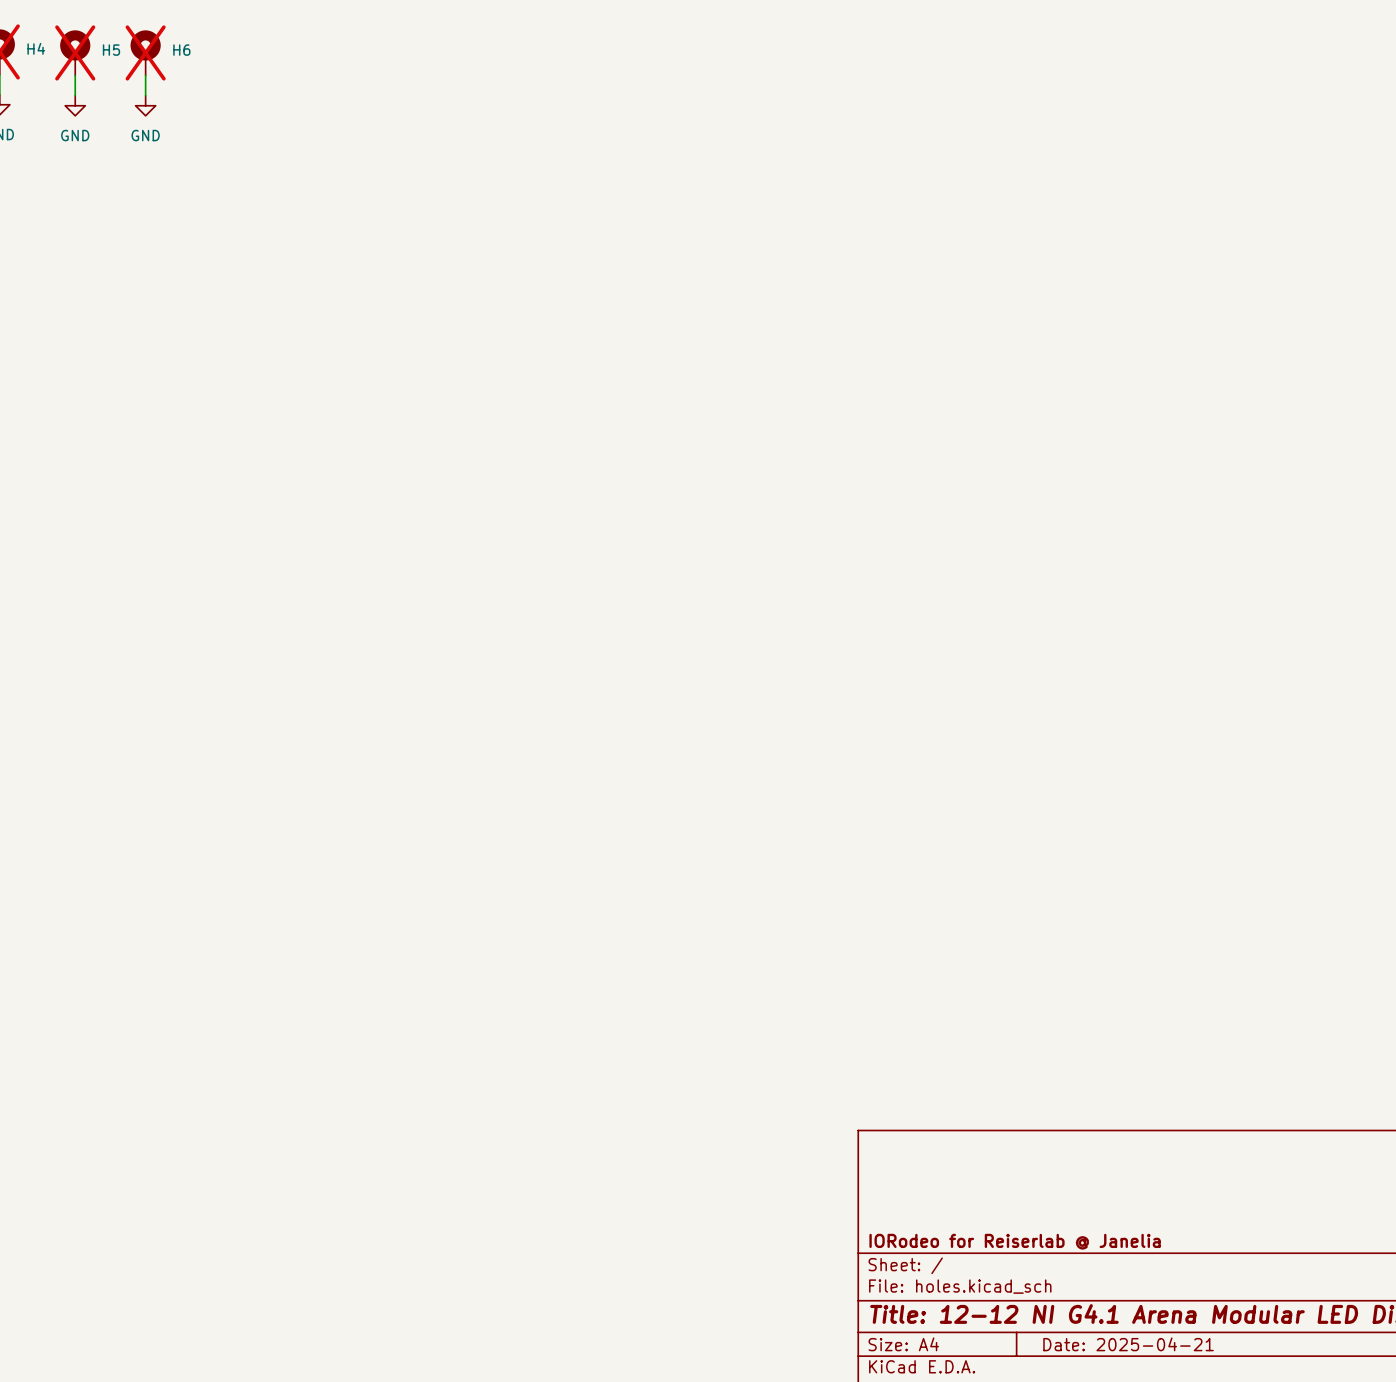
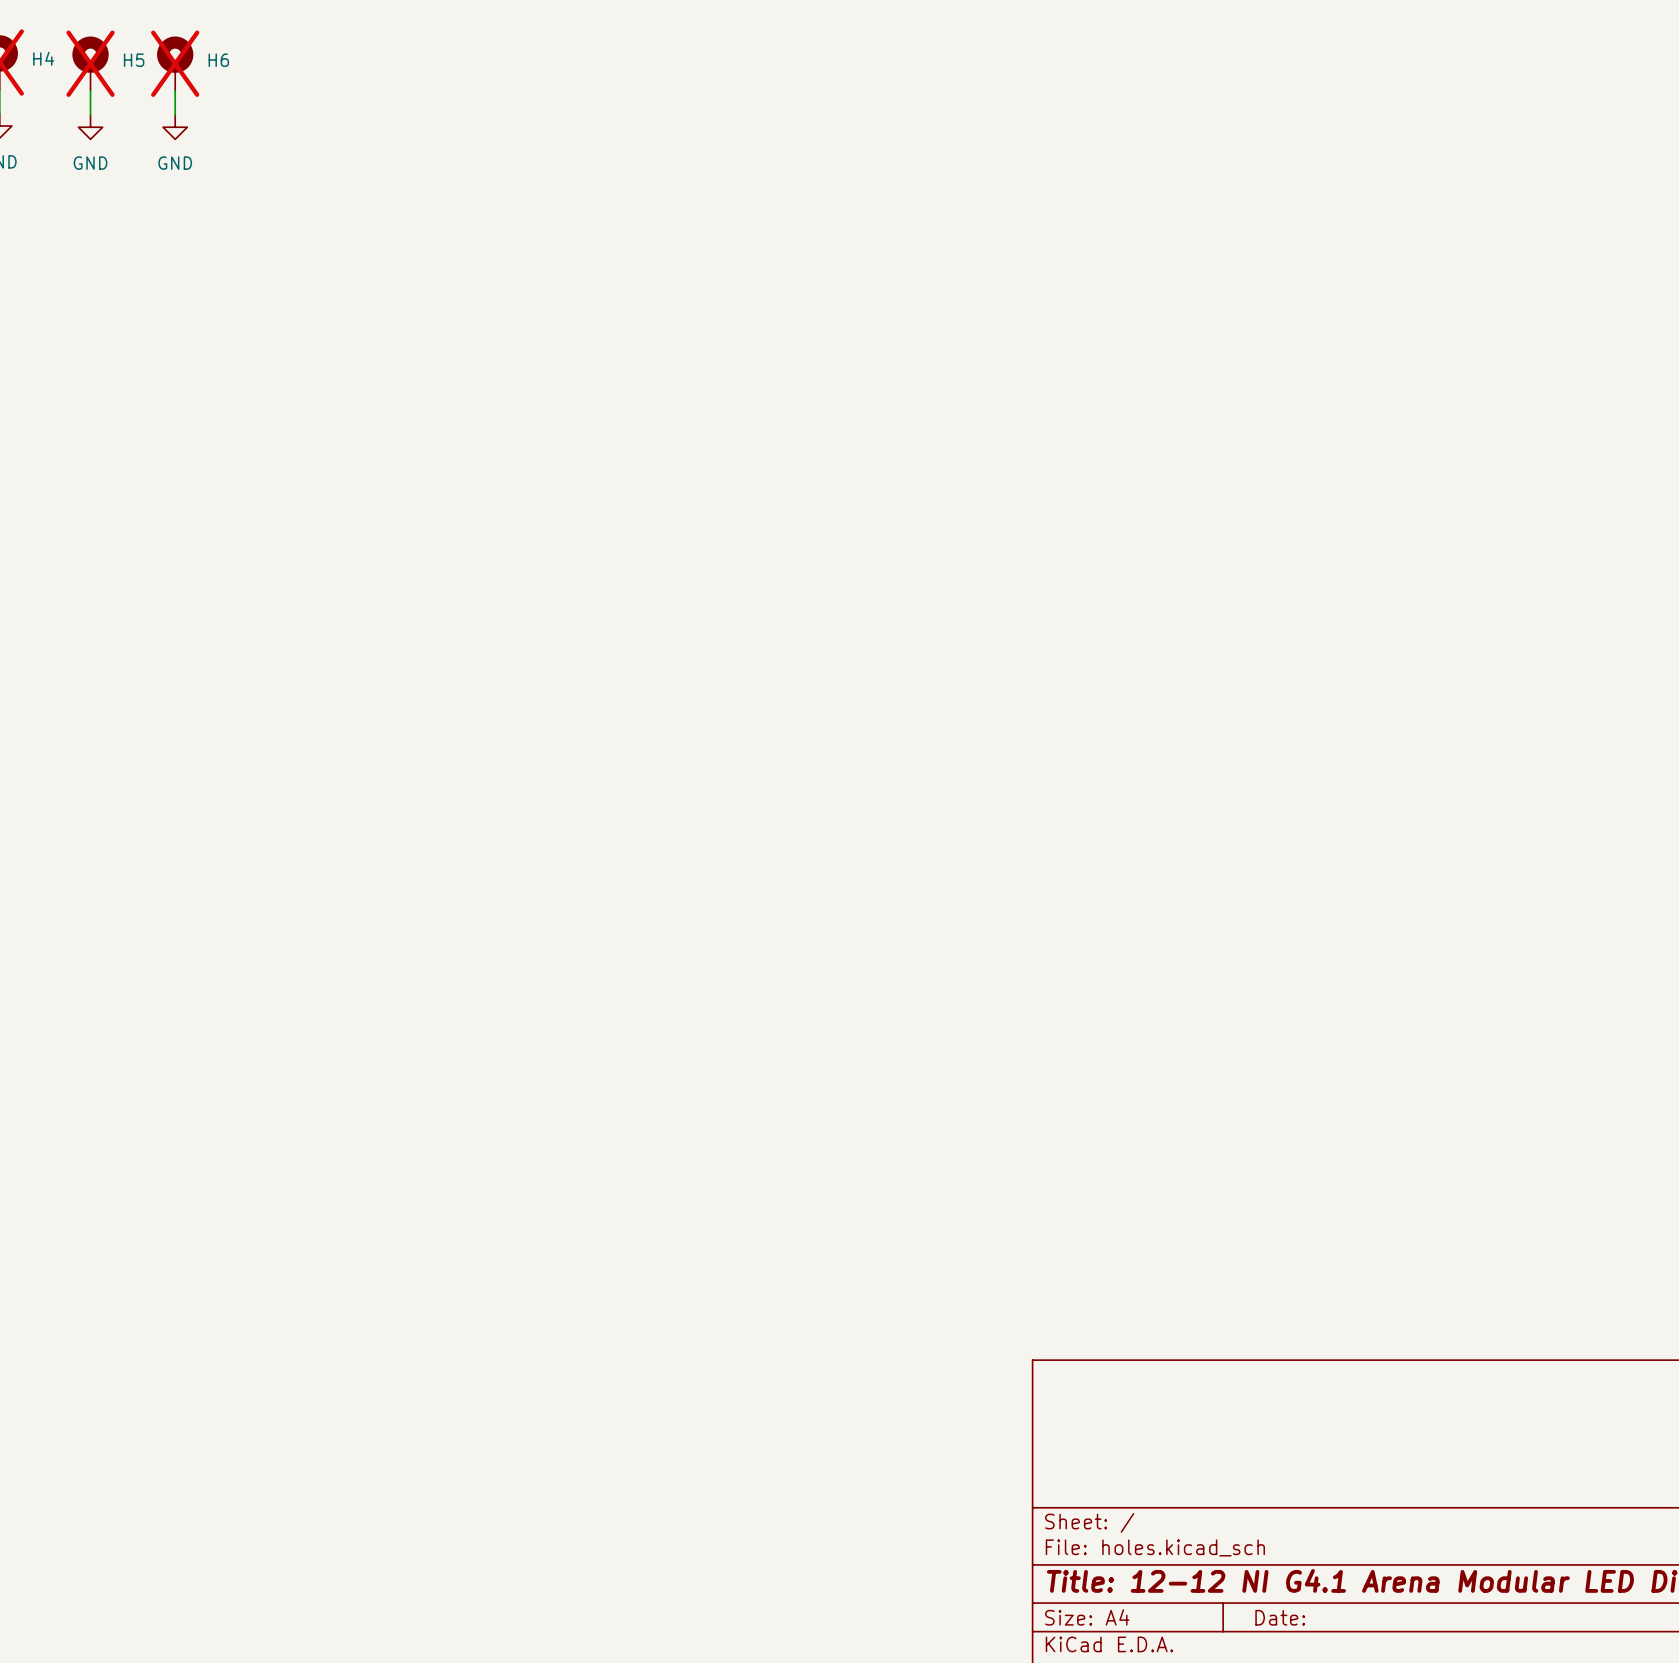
title block: IORodeo for Reiserlab @ Janelia (1015, 1241) -> none
title block: Date: 2025-04-21 (1128, 1344) -> Date: (1280, 1617)

